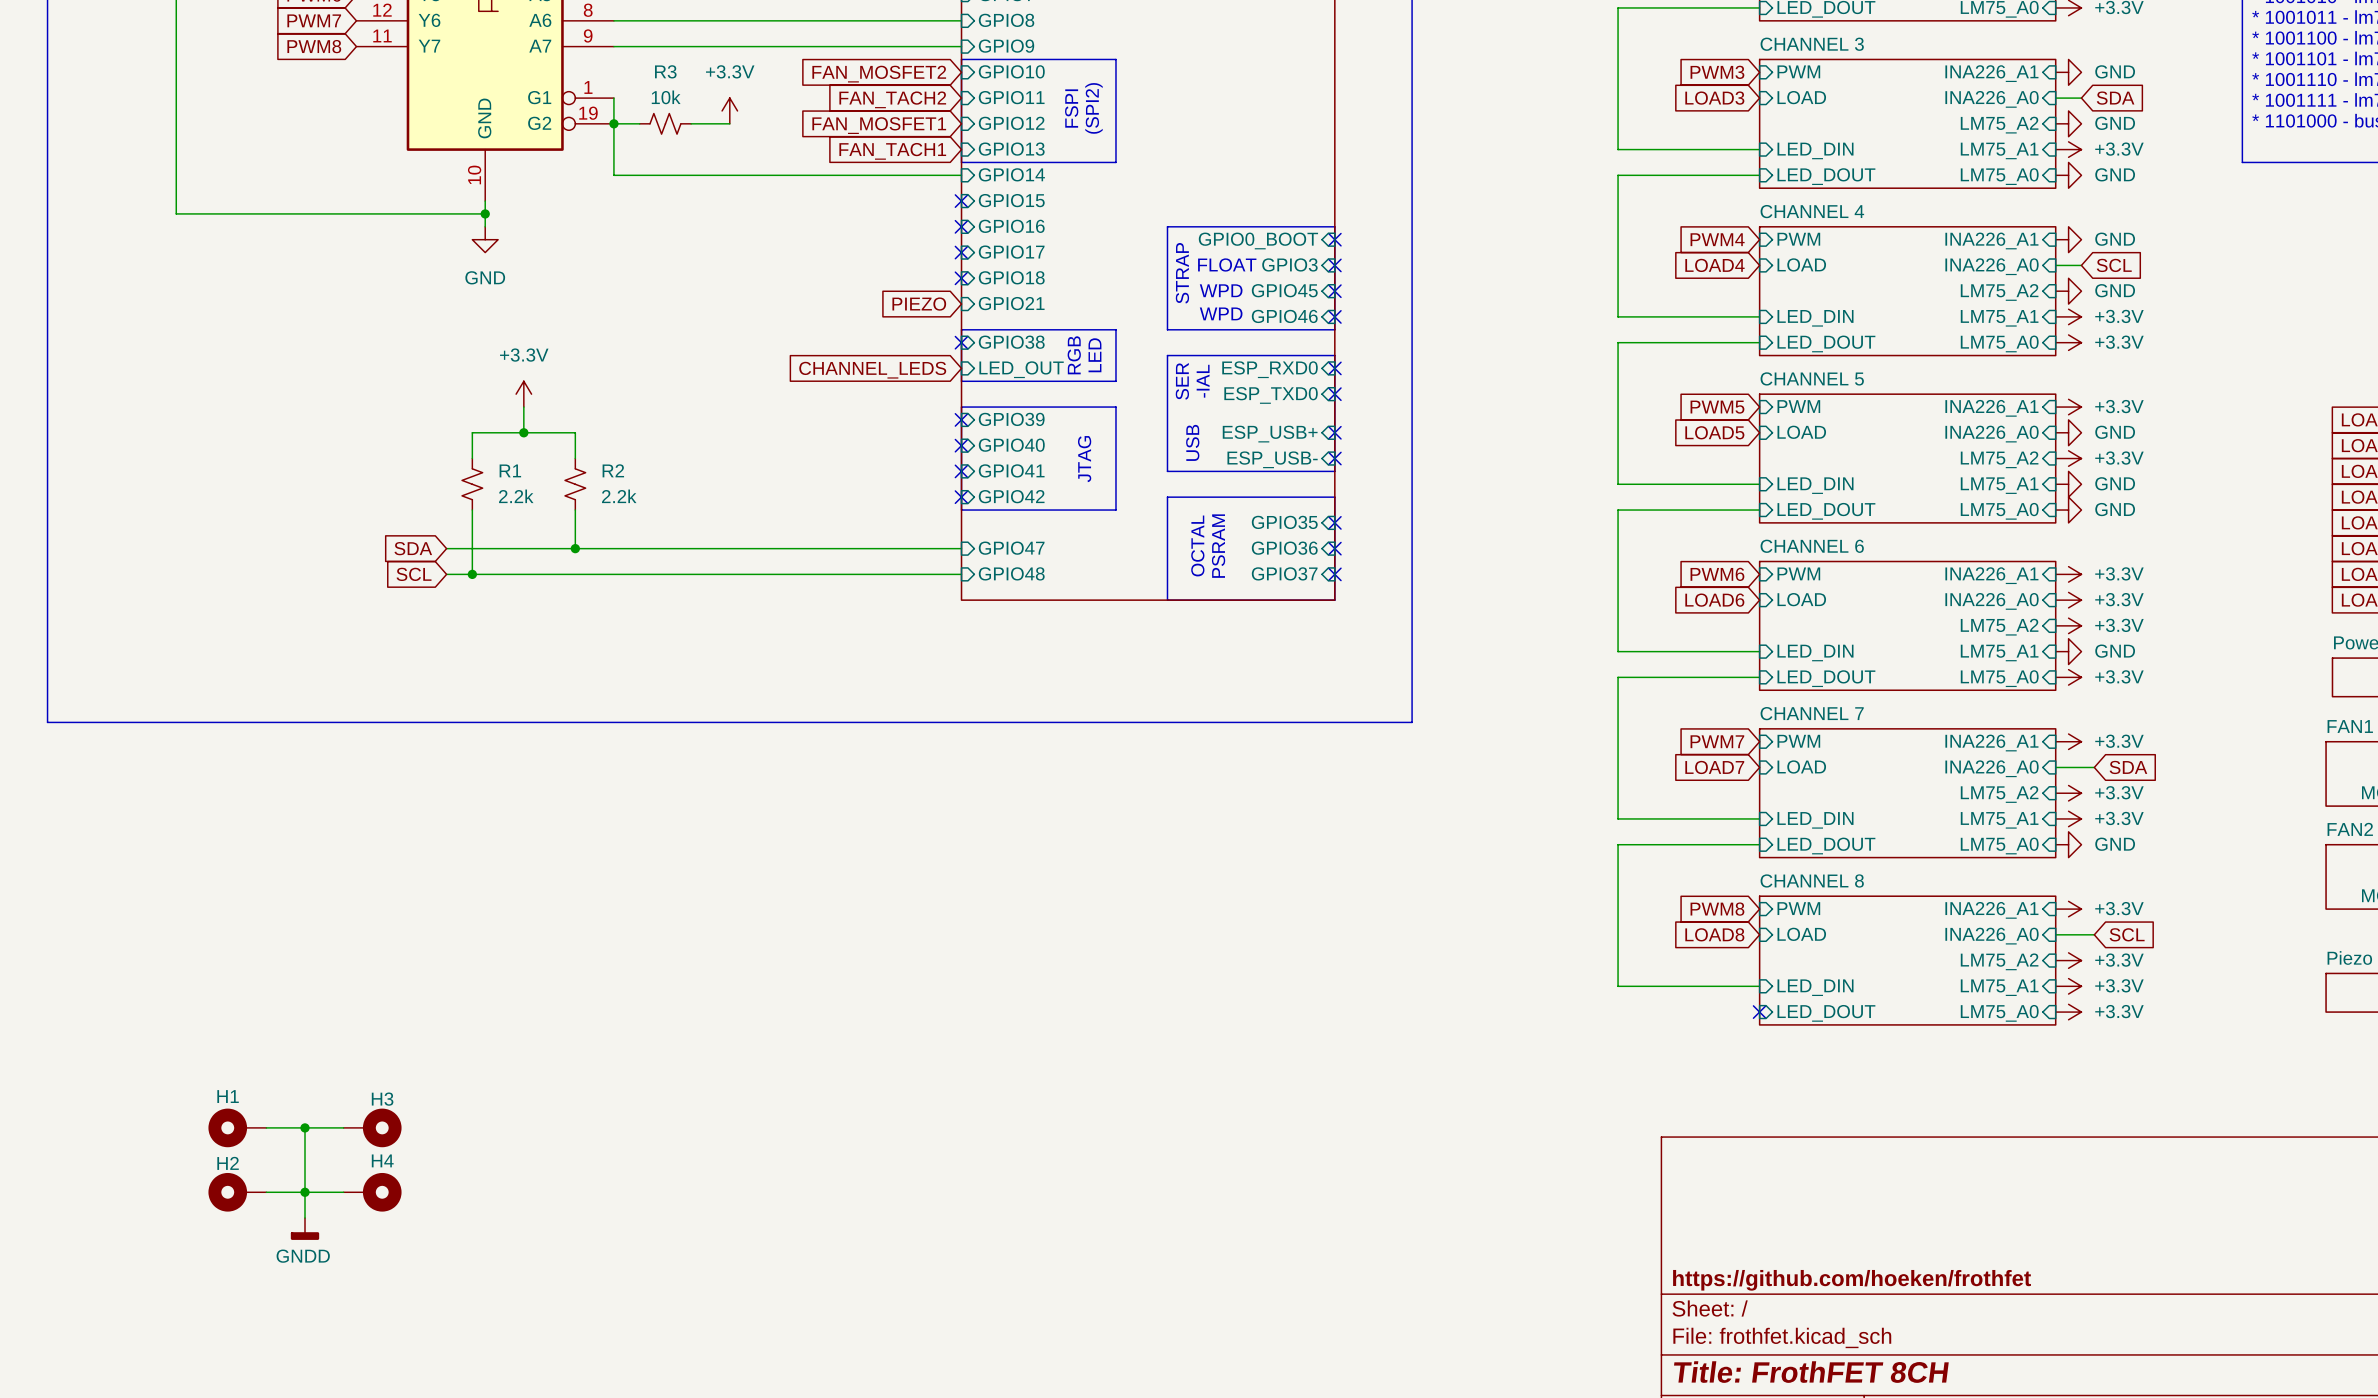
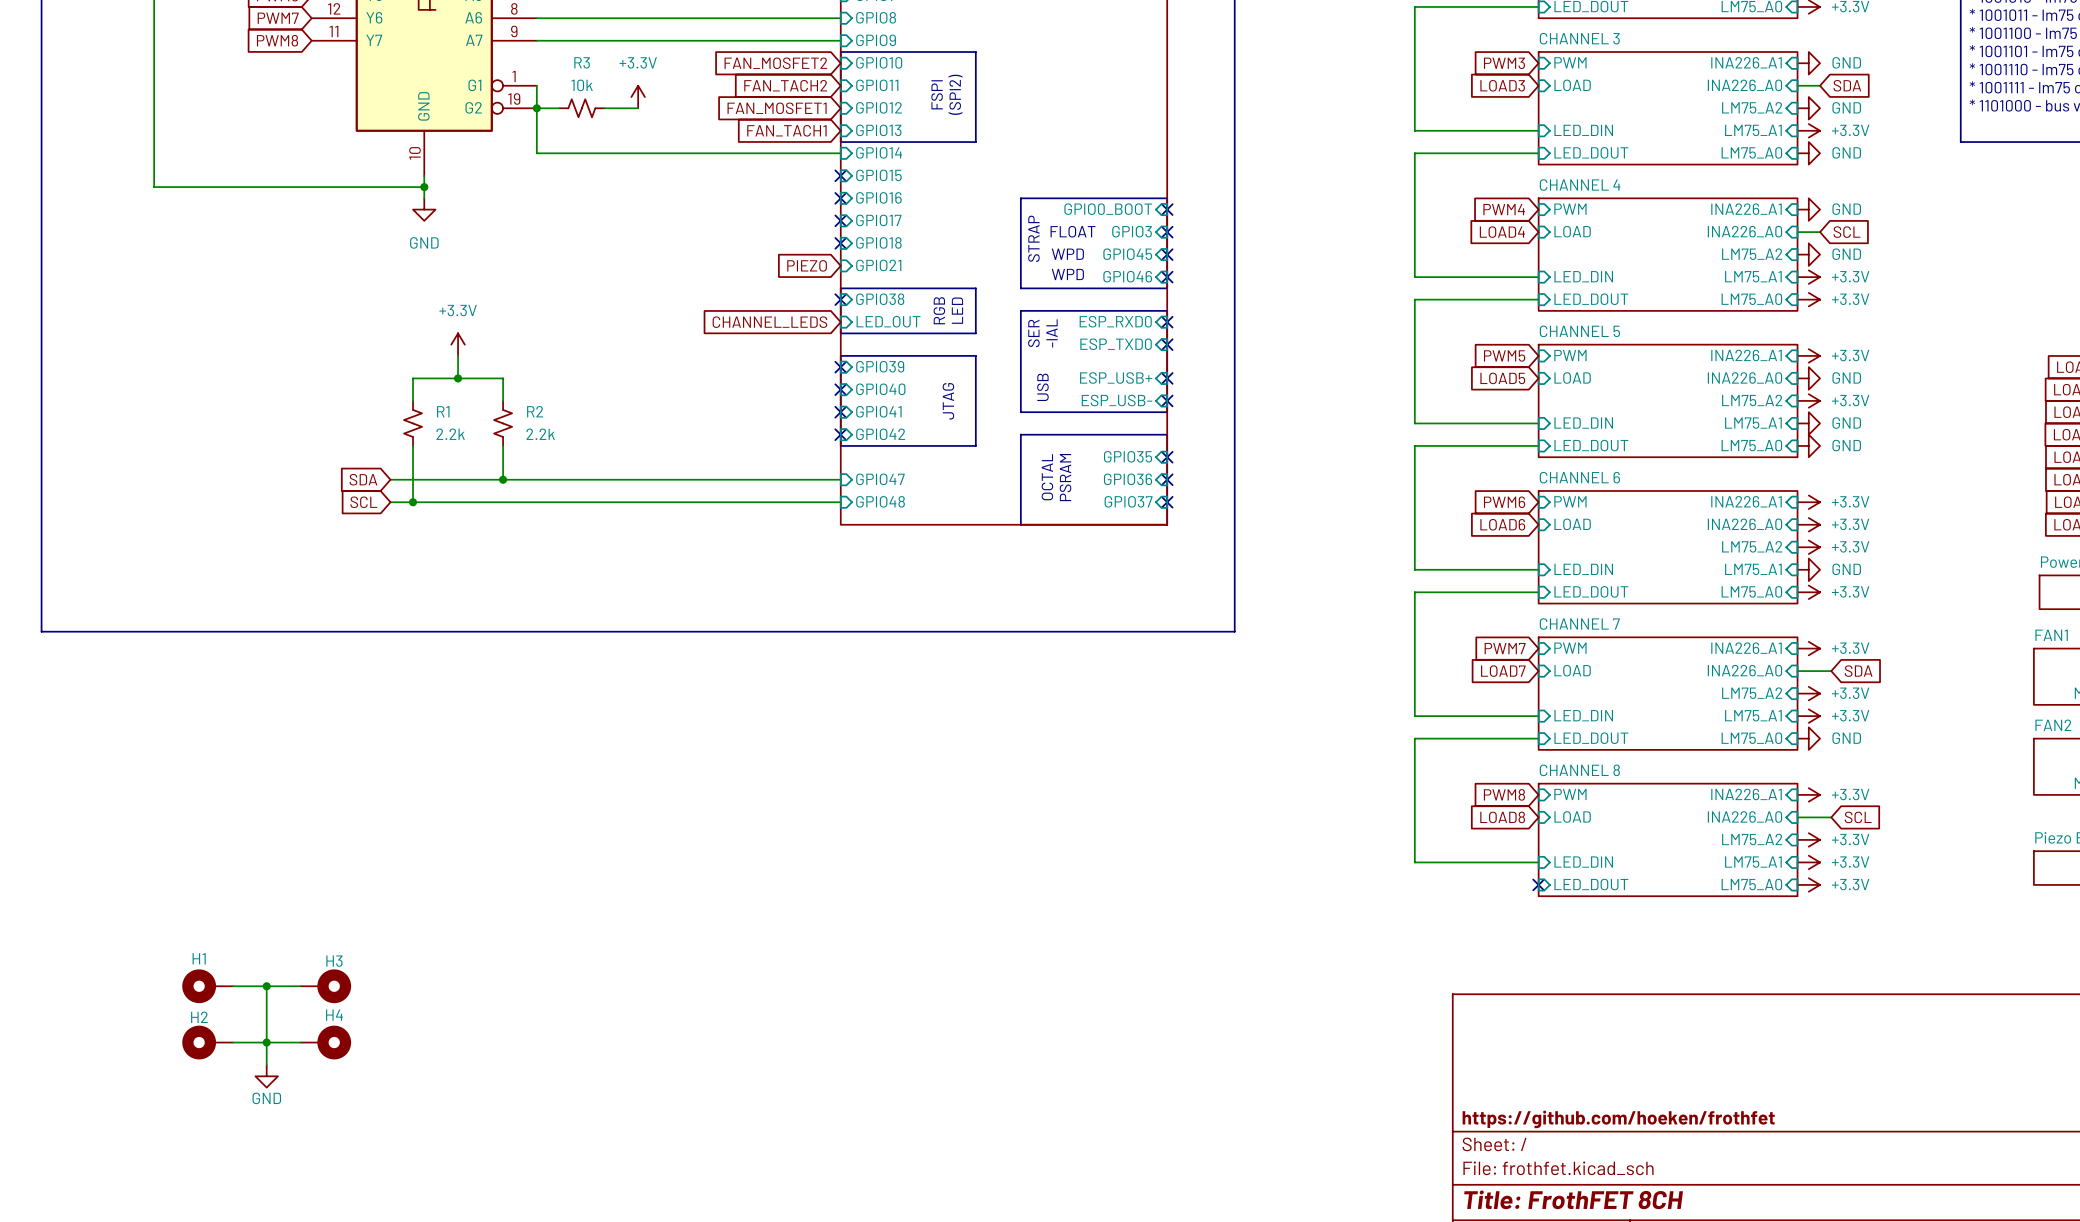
power symbol: GNDD (305, 1228) -> GND (266, 1076)

